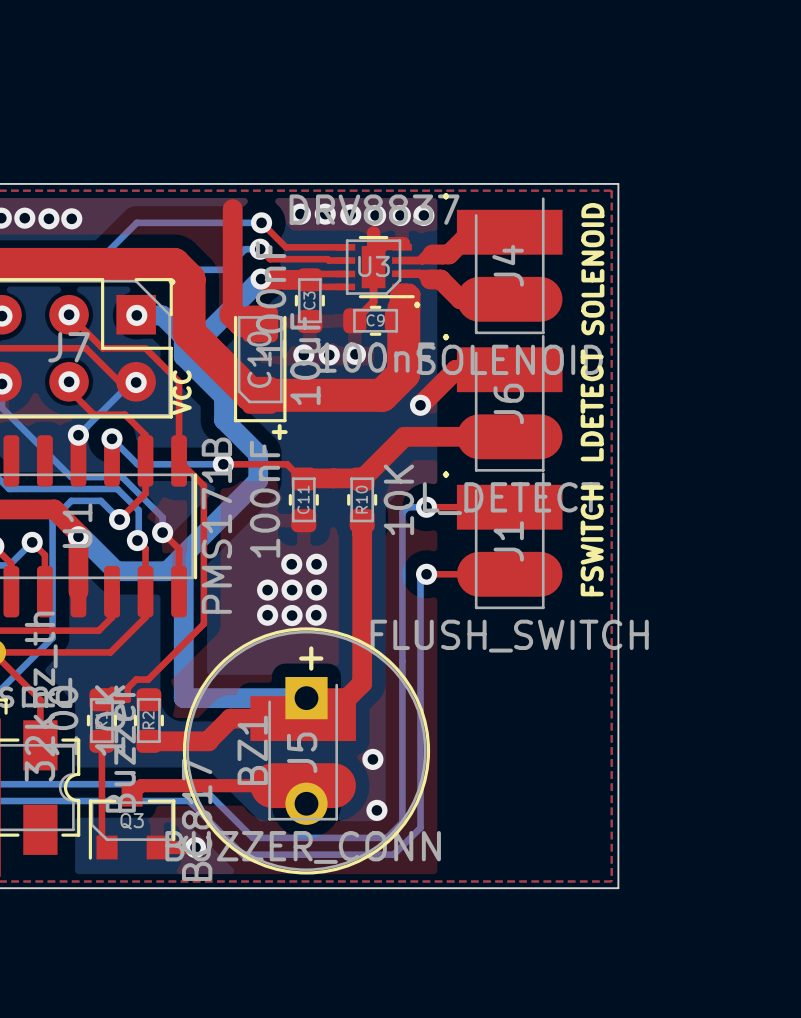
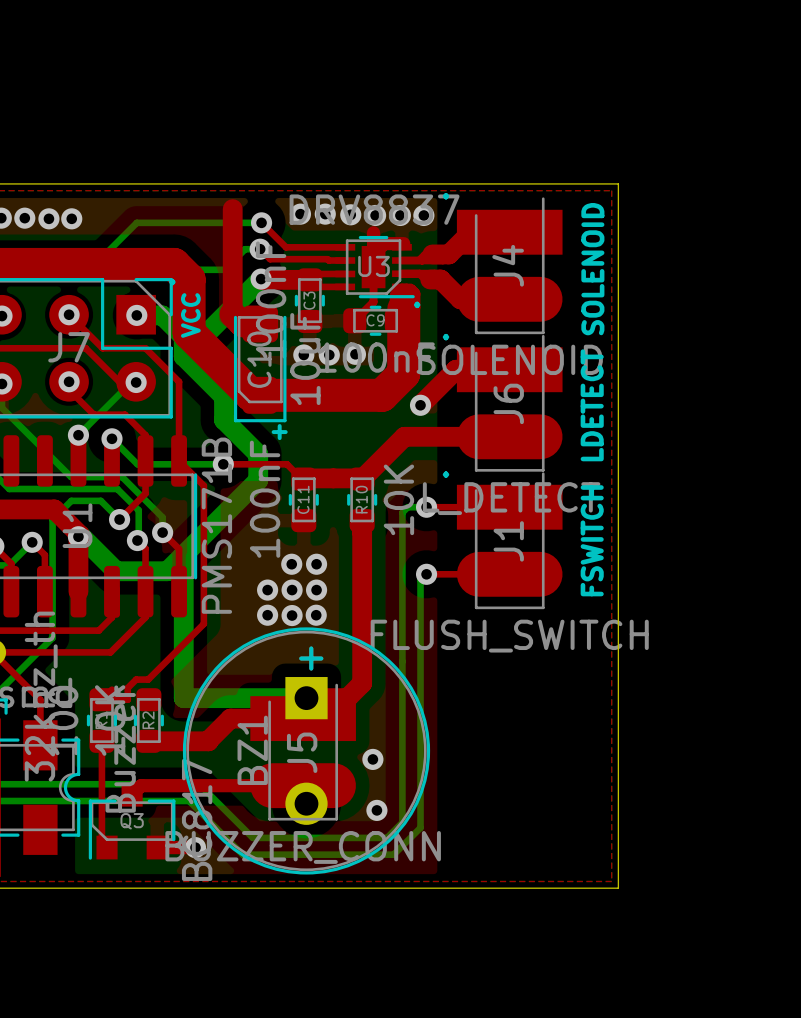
text position: VCC (181, 392) -> VCC (190, 315)

